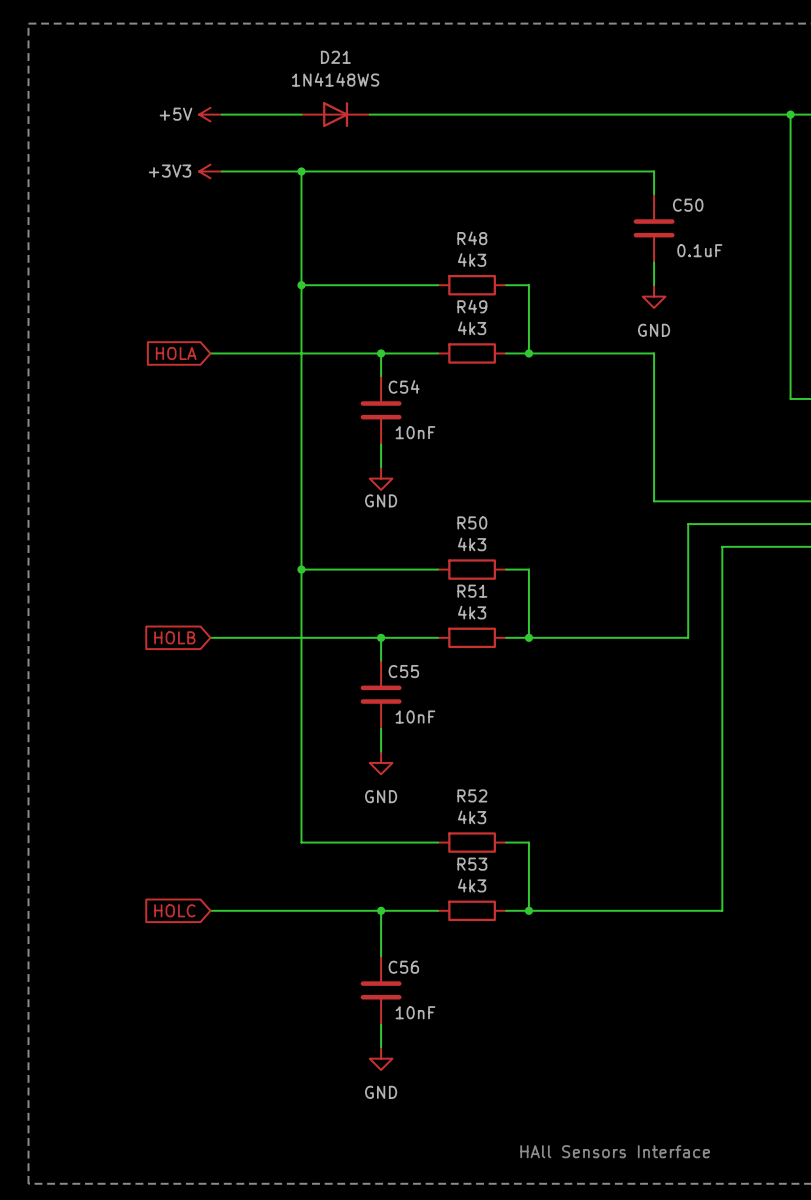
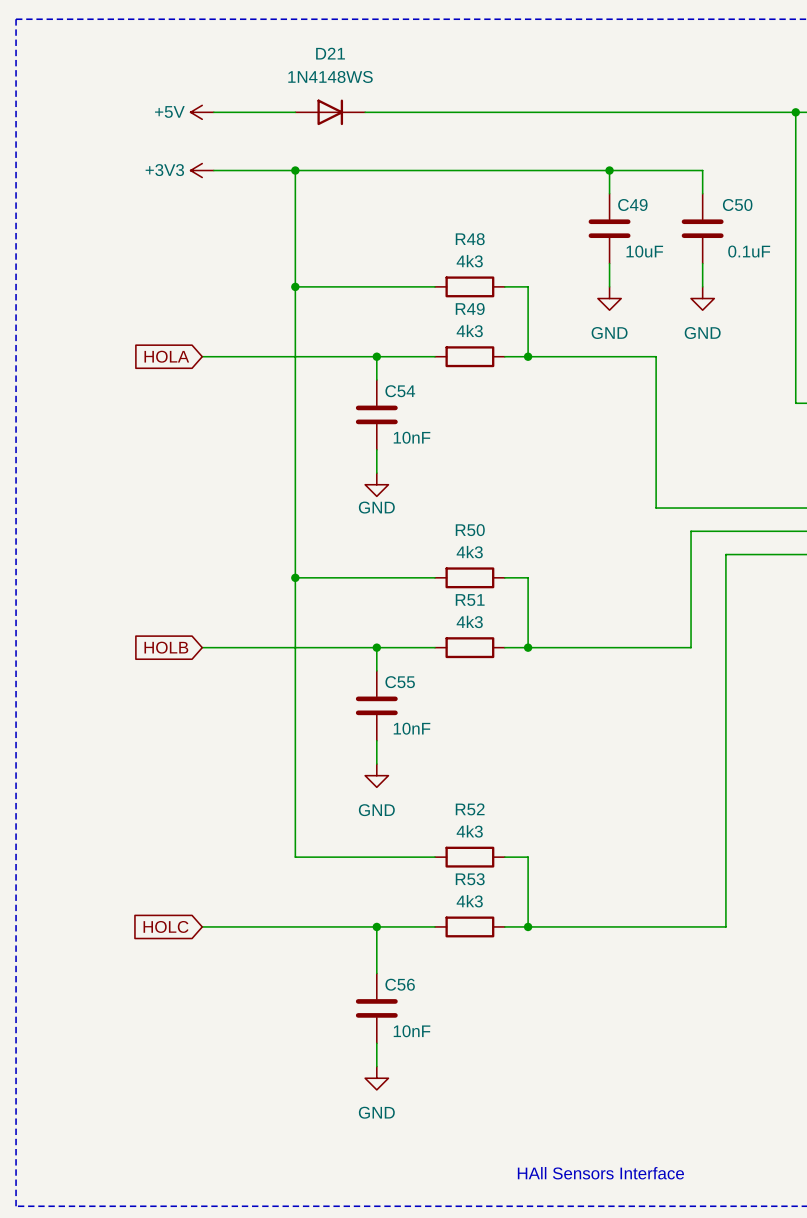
wire: none -> (609, 170) (609, 193)
junction: none -> (609, 170)
wire: (654, 171) (654, 194) -> (656, 170) (702, 170) (702, 193)
C49: none -> 10uF (609, 228)
C50 position: (654, 228) -> (702, 228)
wire: (654, 262) (654, 285) -> (609, 263) (609, 286)
wire: none -> (702, 263) (702, 286)
power symbol: none -> GND (609, 298)
power symbol: GND (654, 296) -> none
power symbol: none -> GND (702, 298)

